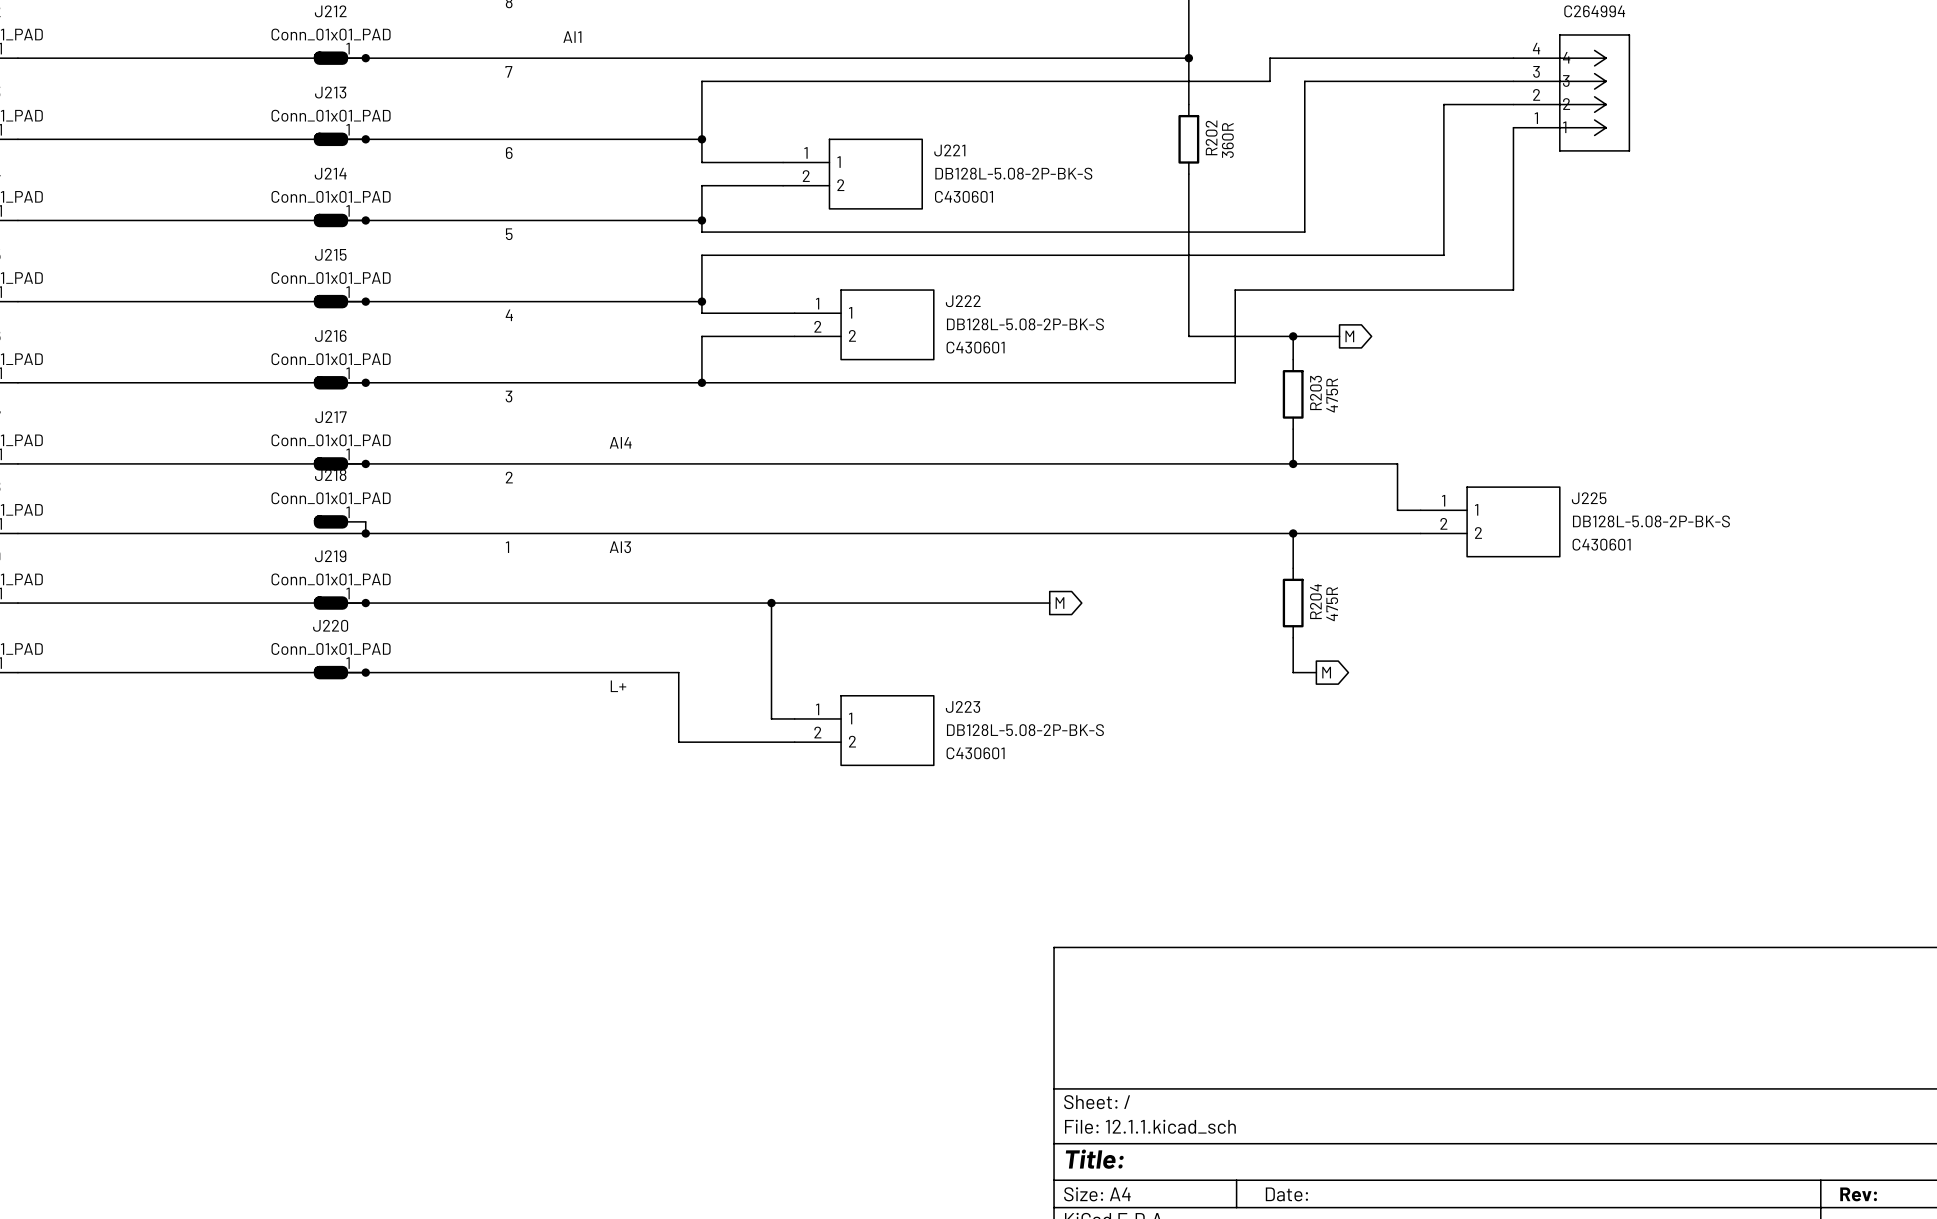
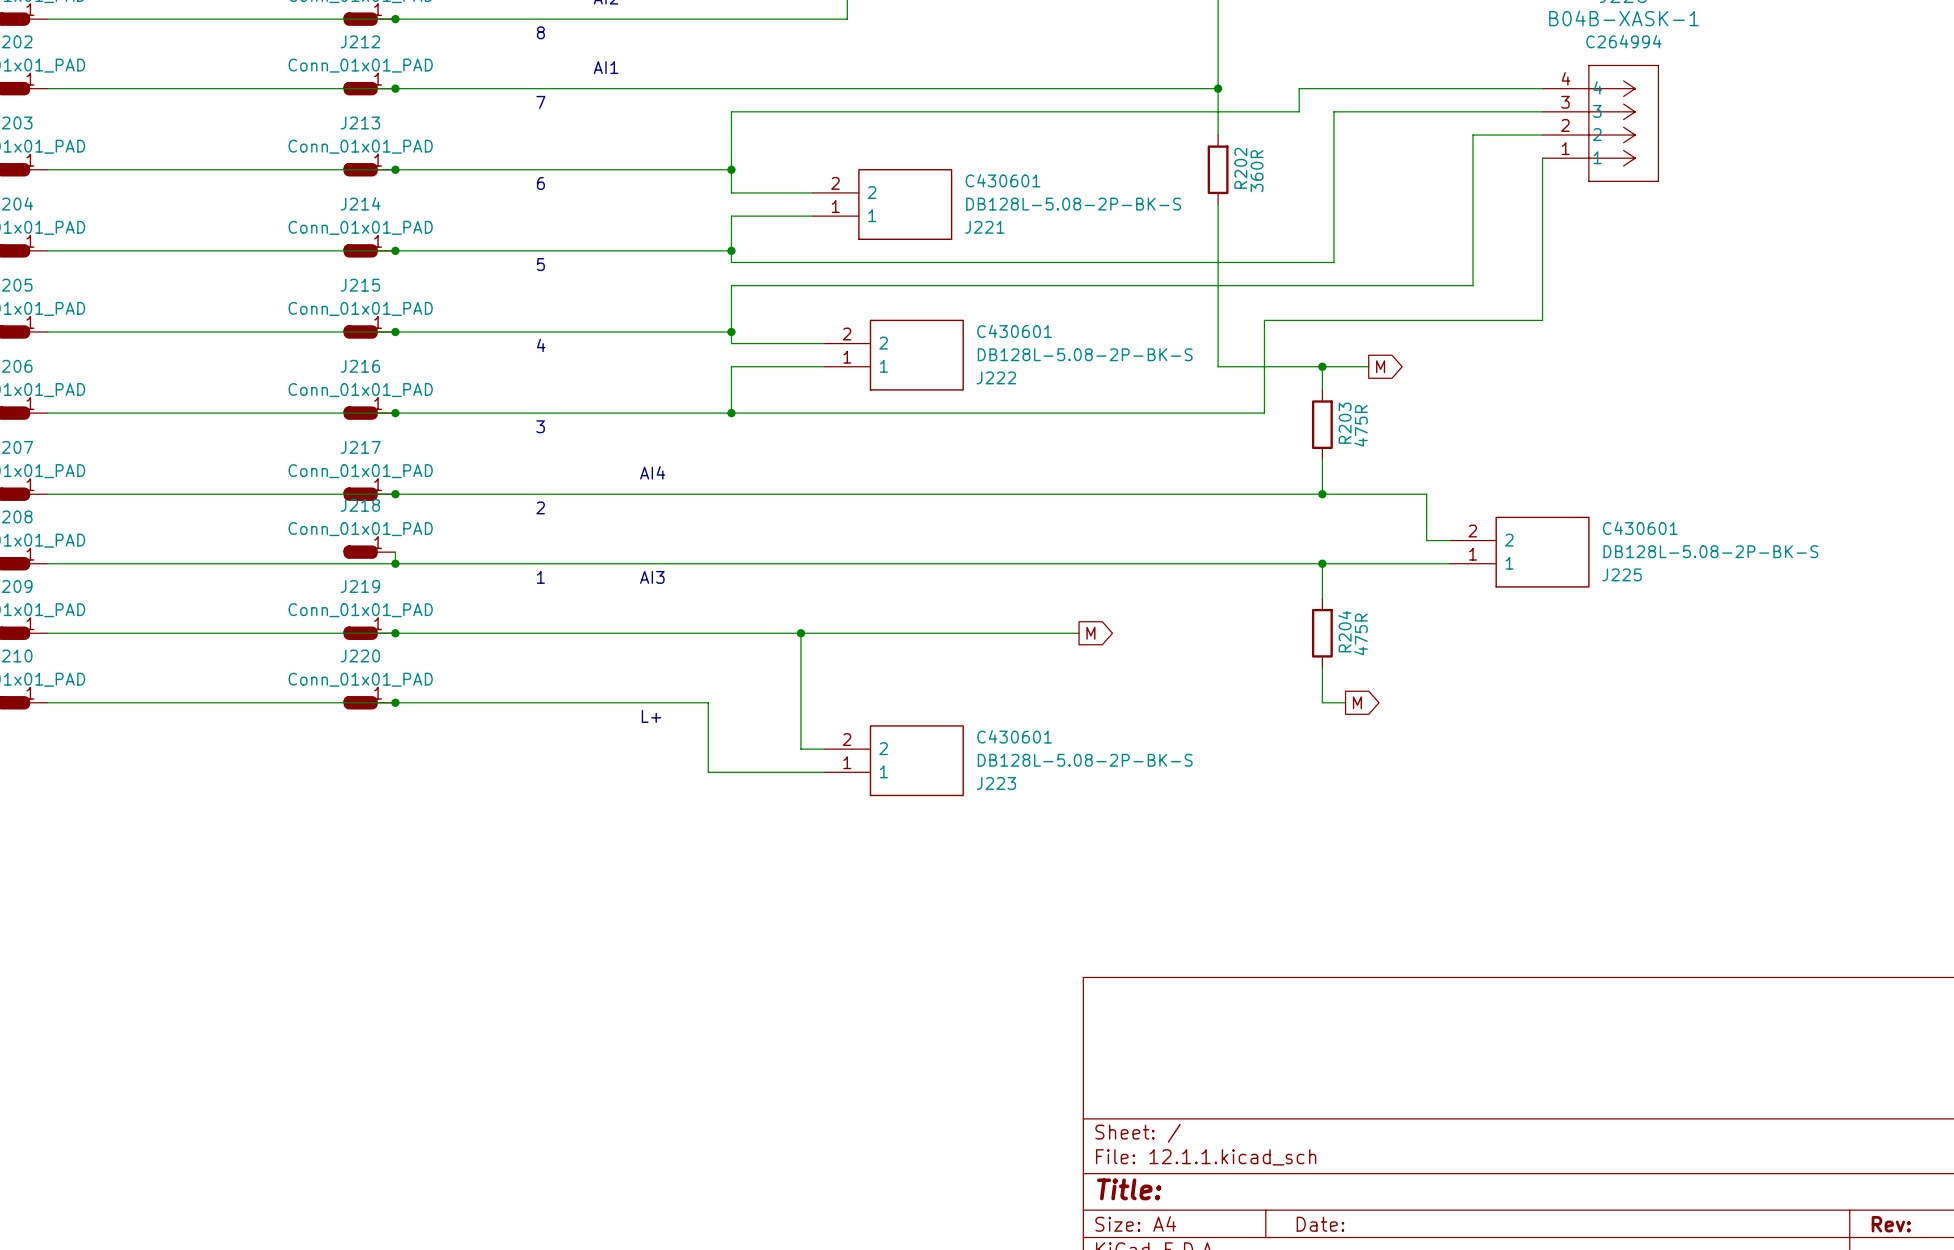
J221 flip: as is (875, 174) -> up-down (905, 204)
J222 flip: as is (887, 324) -> up-down (916, 355)
J225 flip: as is (1513, 521) -> up-down (1542, 552)
J223 flip: as is (887, 730) -> up-down (916, 760)

